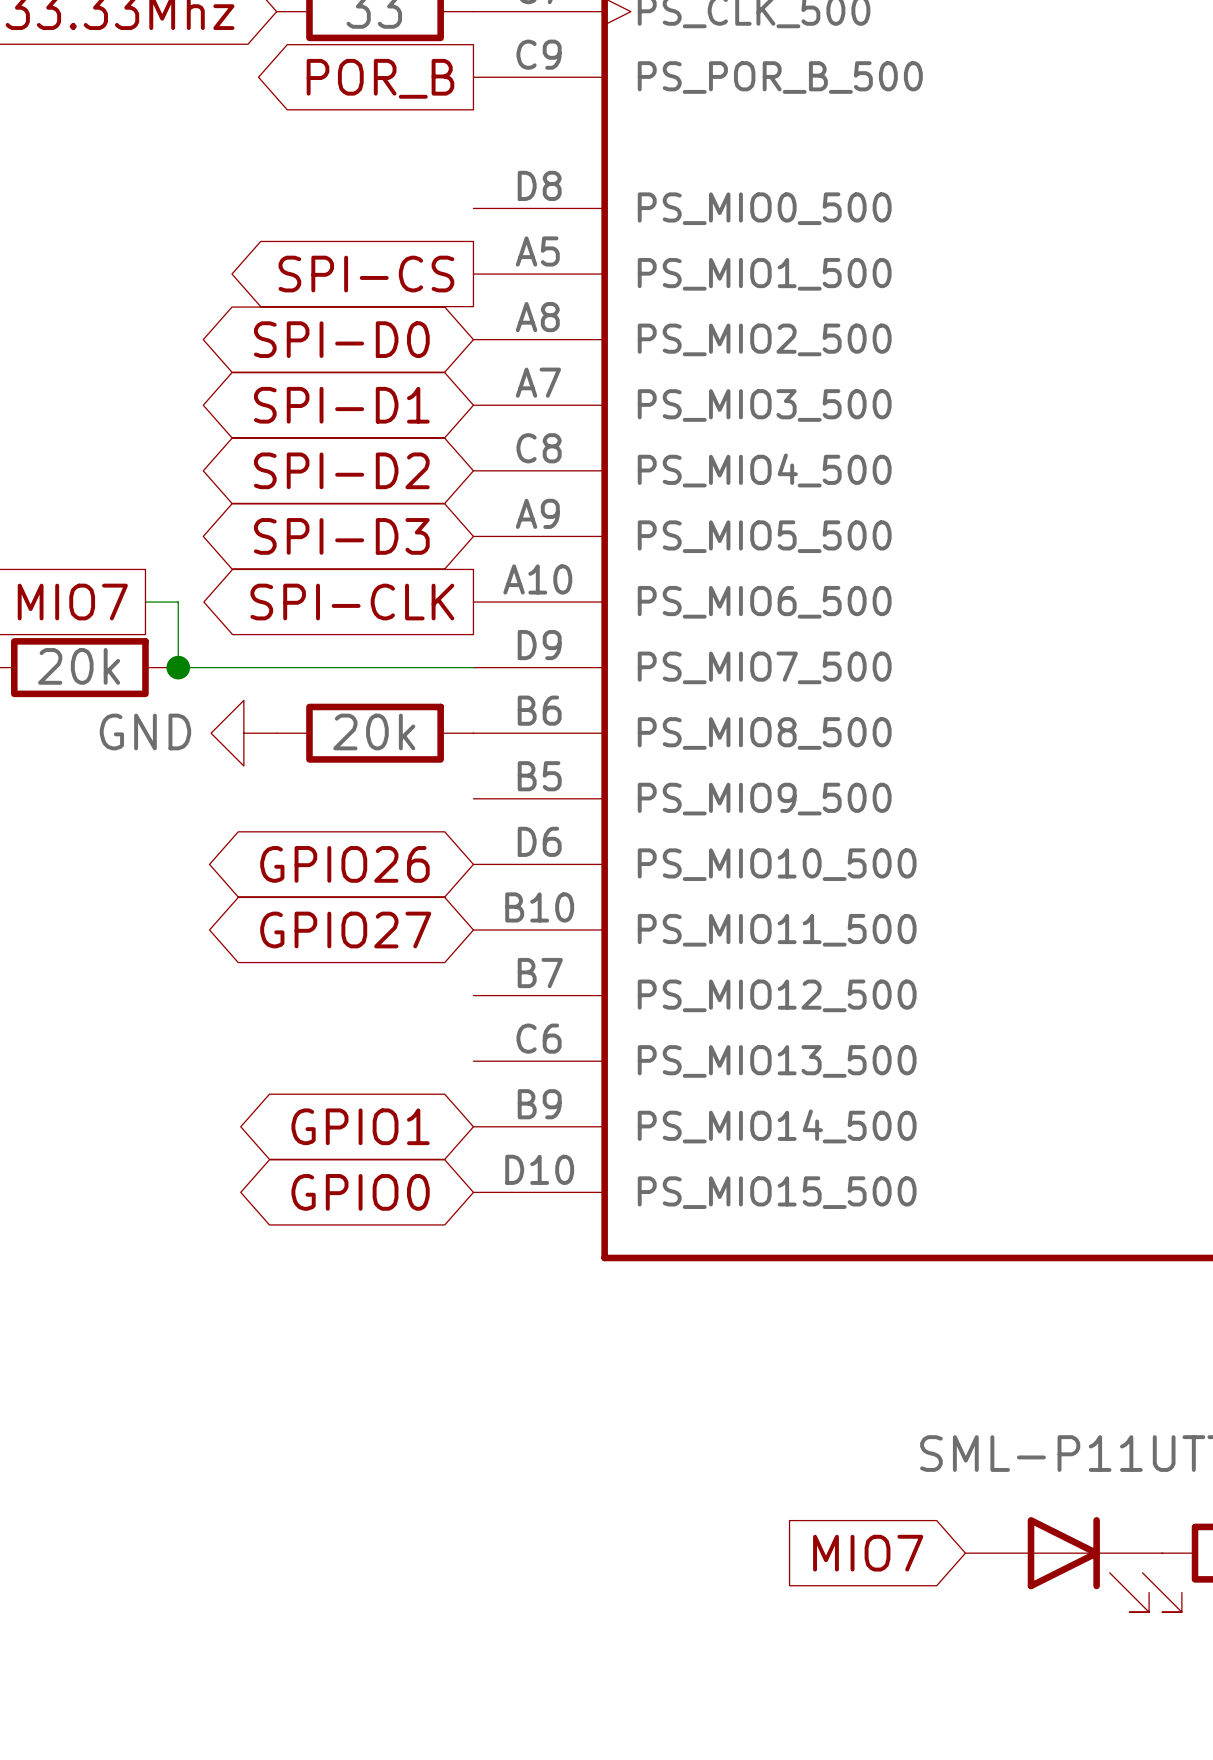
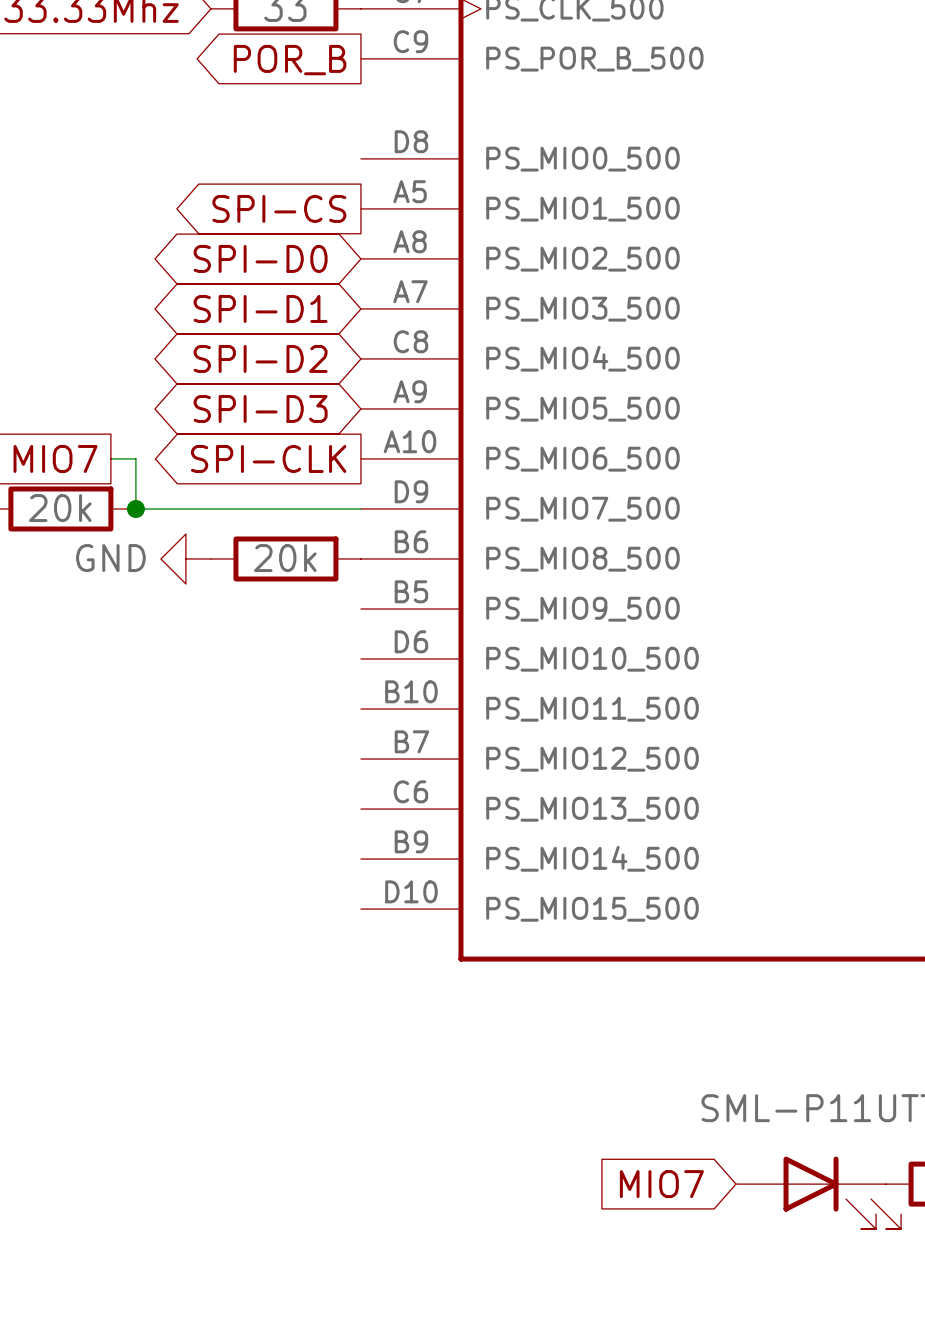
global label: GPIO26 (344, 864) -> none
global label: GPIO27 (345, 930) -> none
global label: GPIO1 (360, 1126) -> none
global label: GPIO0 (360, 1192) -> none

